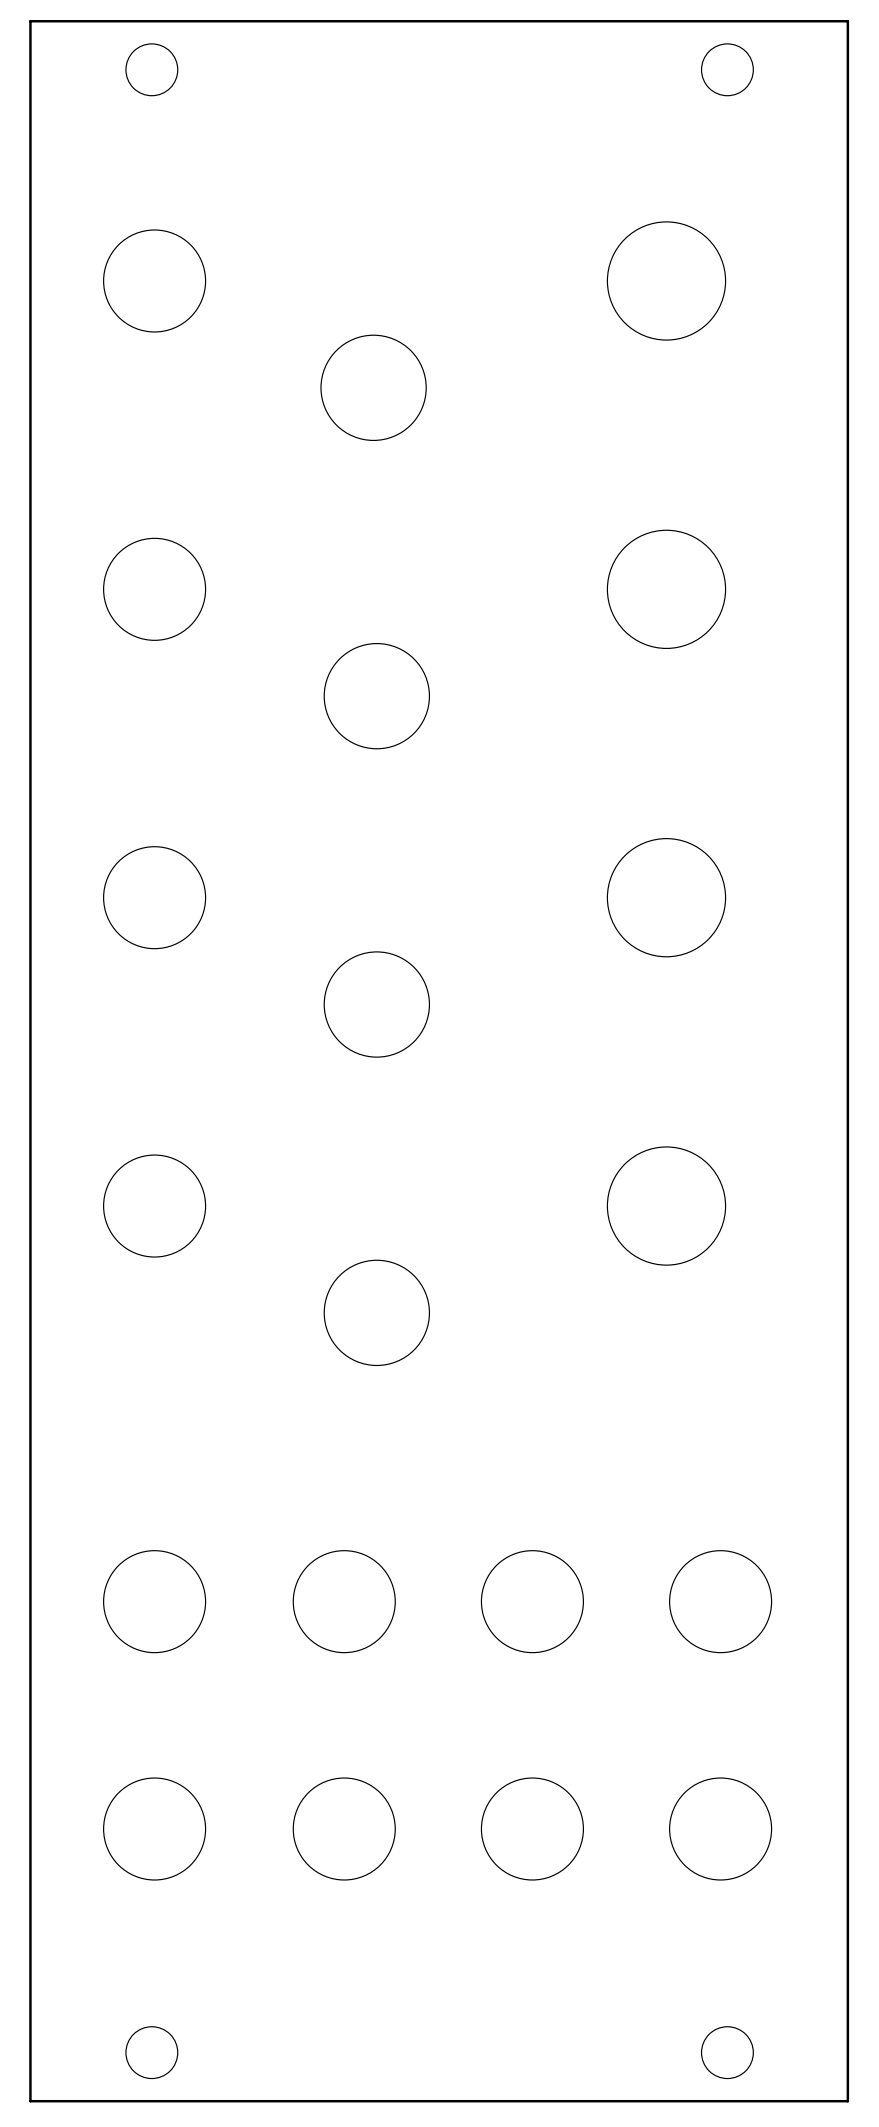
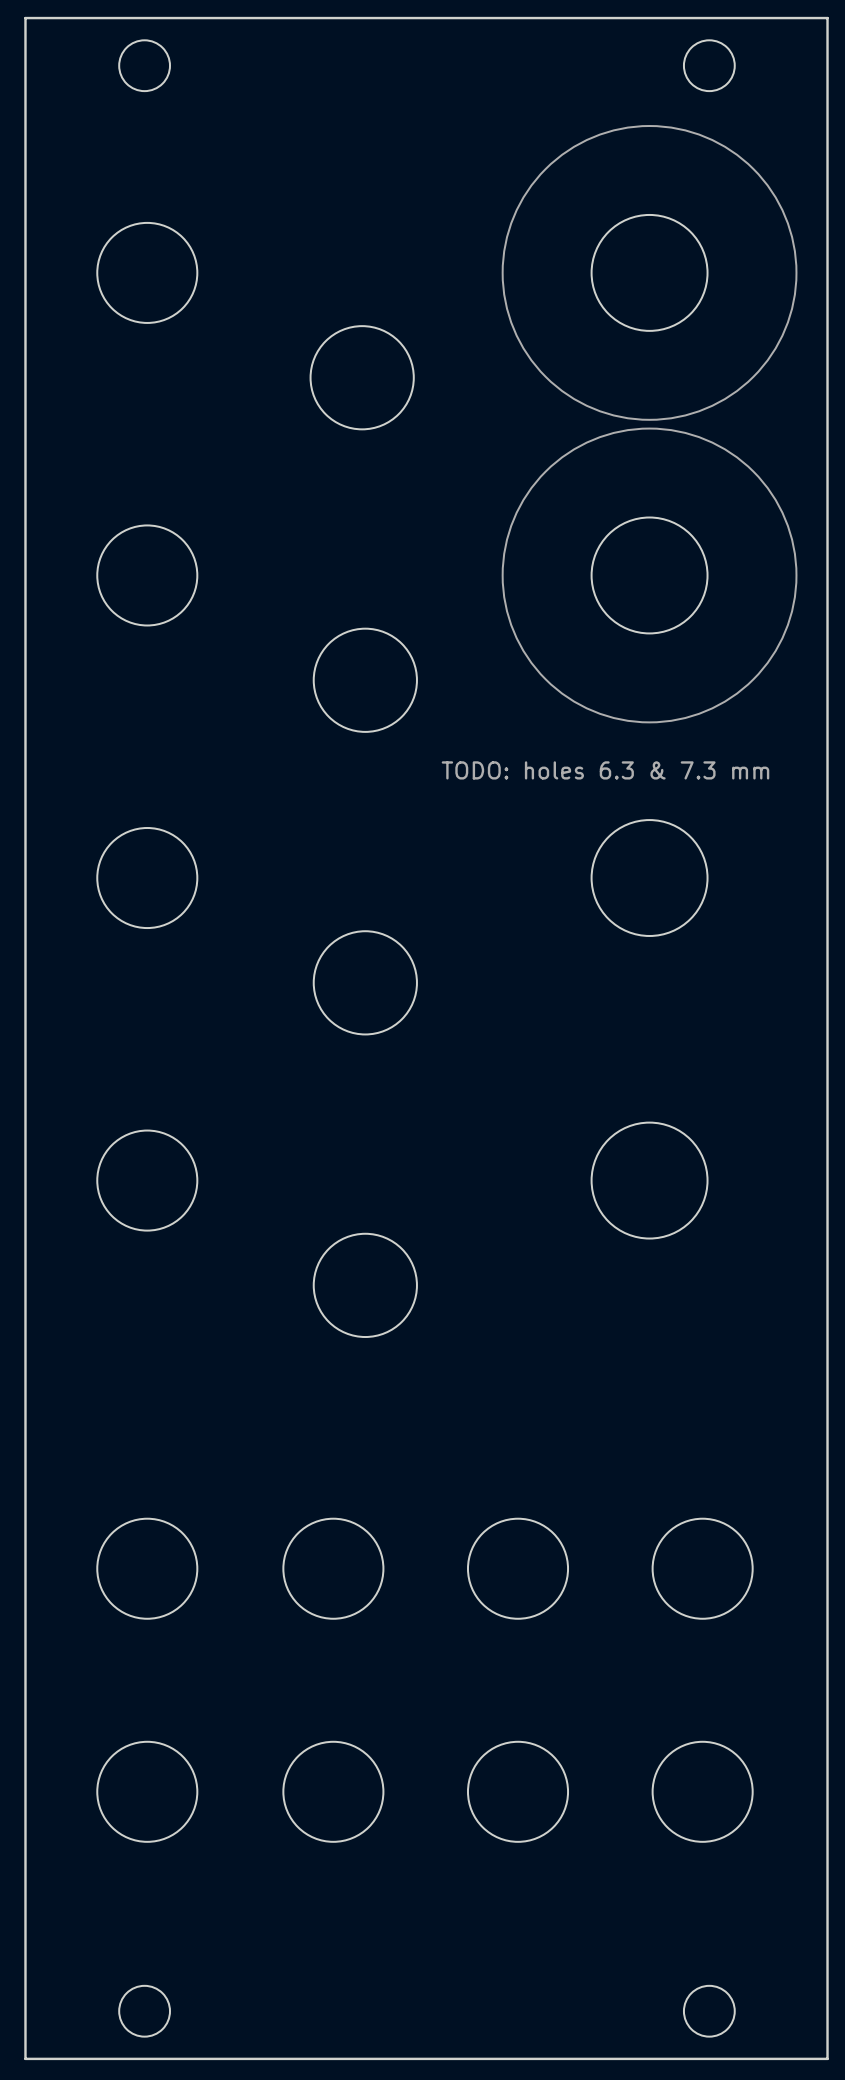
drawing: none -> [501, 125, 798, 724]
text: none -> TODO: holes 6.3 & 7.3 mm (605, 770)

